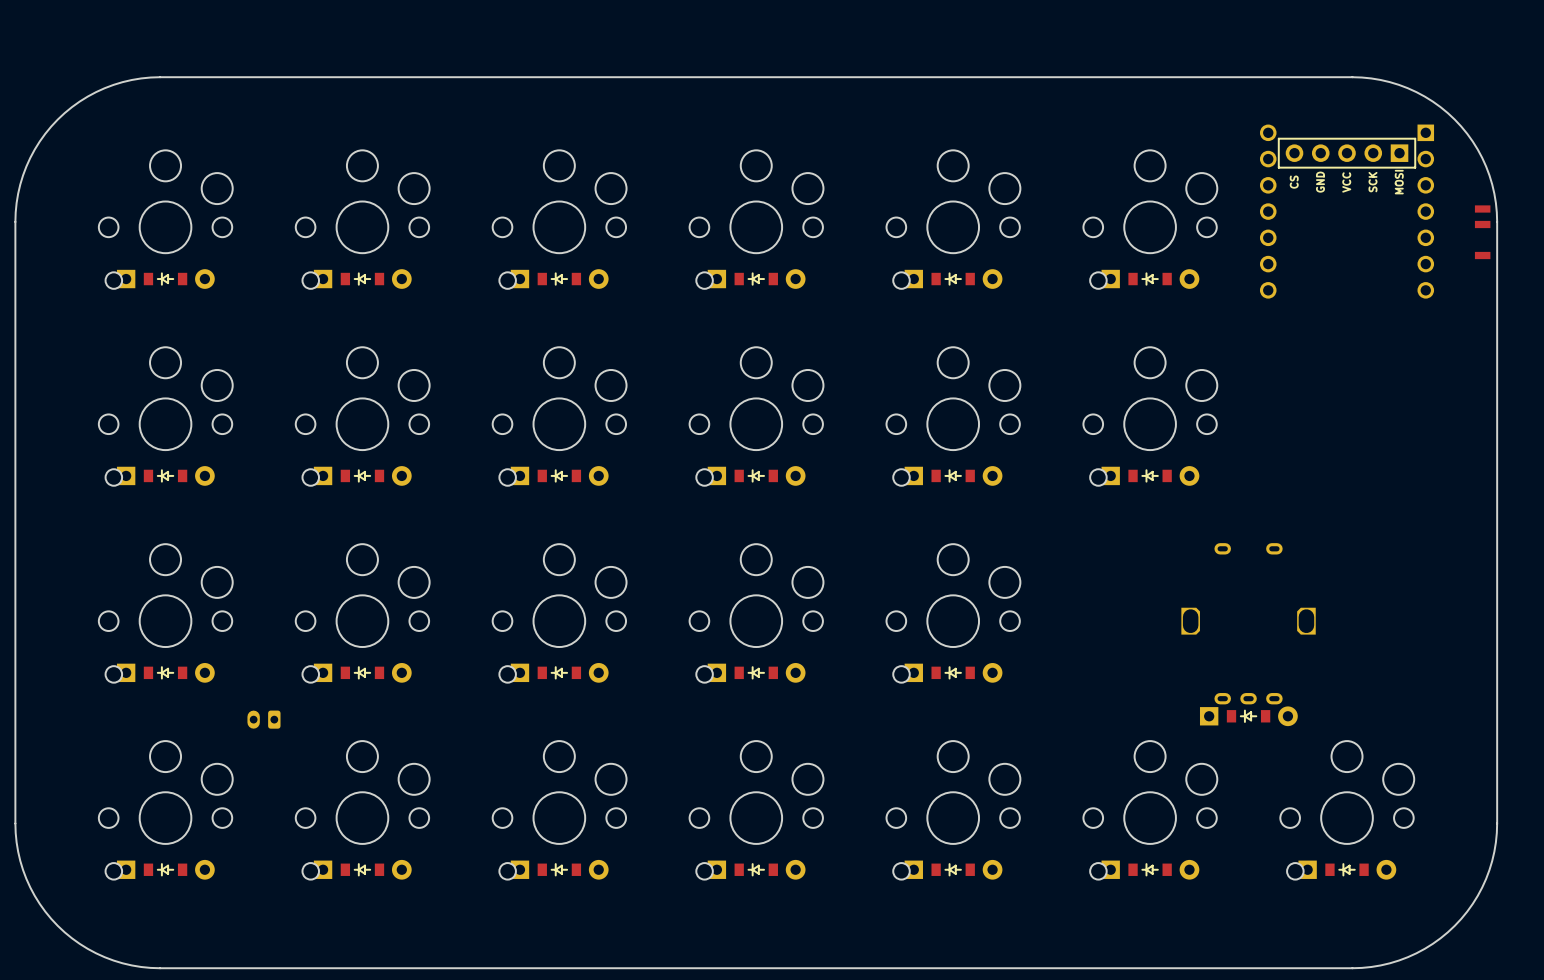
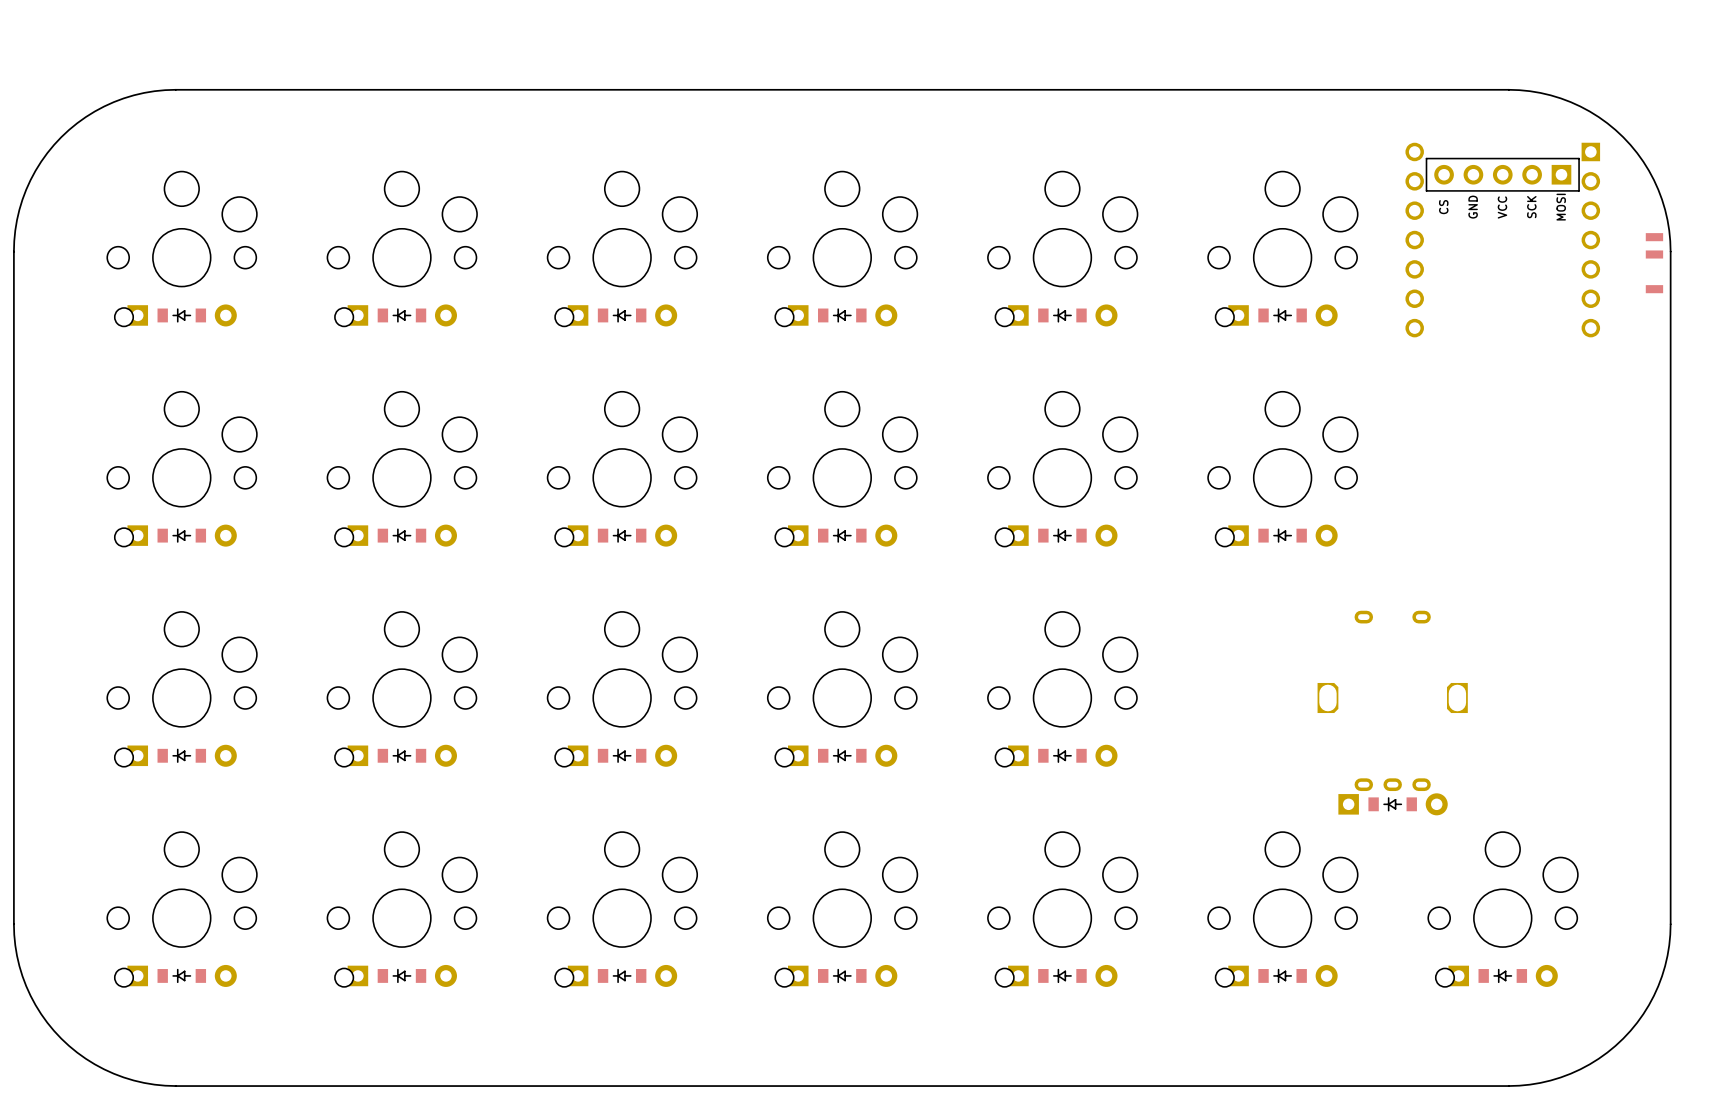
part: (263, 719) -> none

